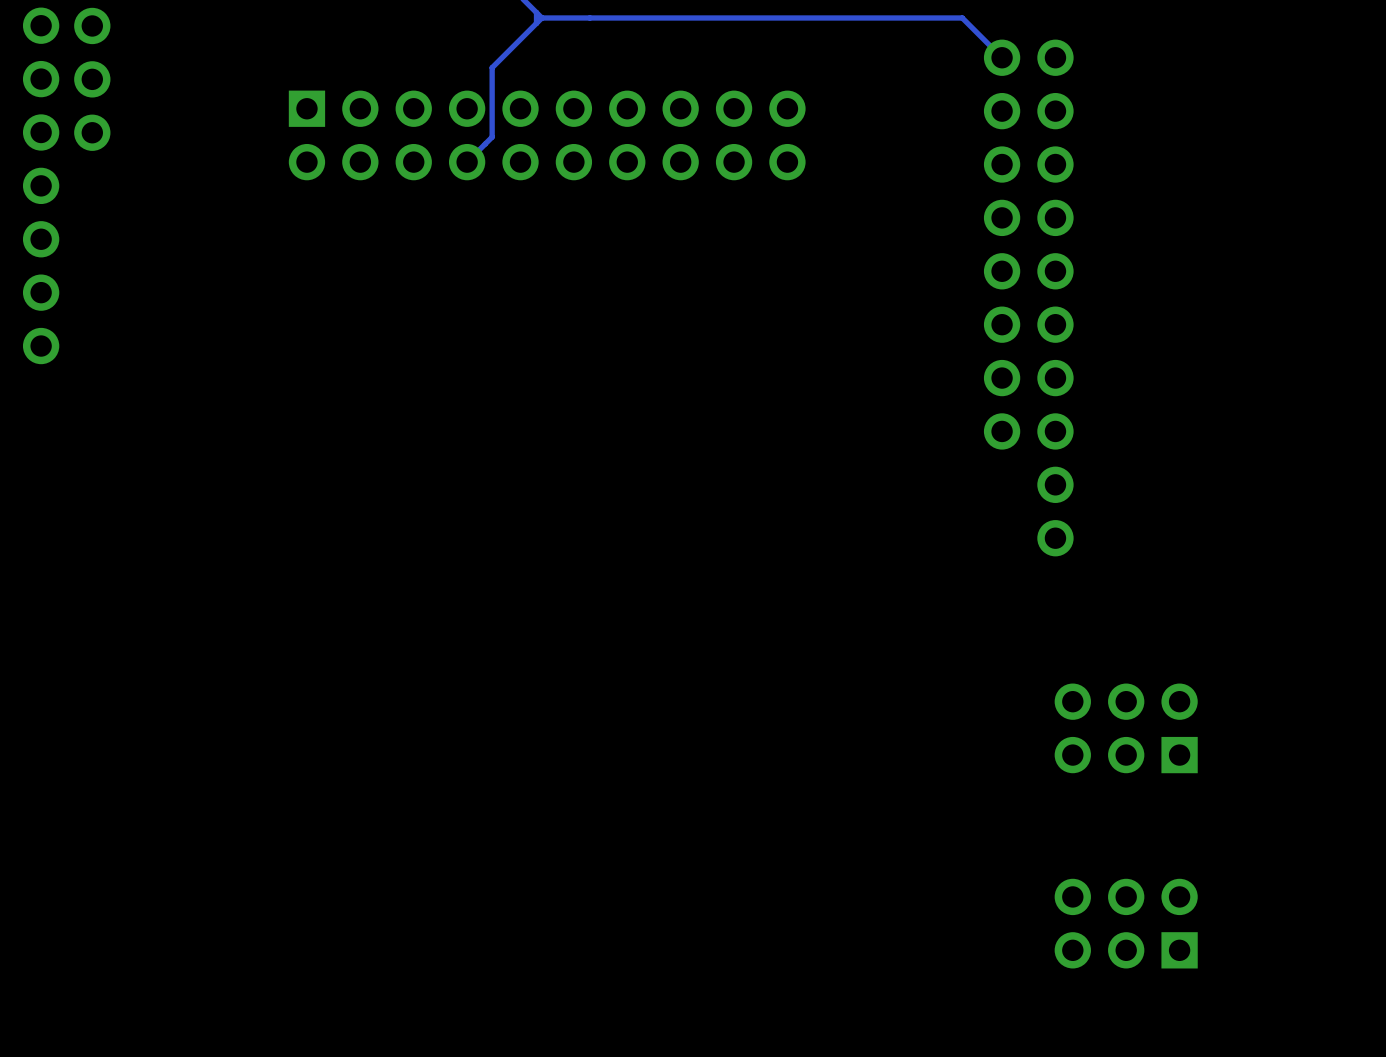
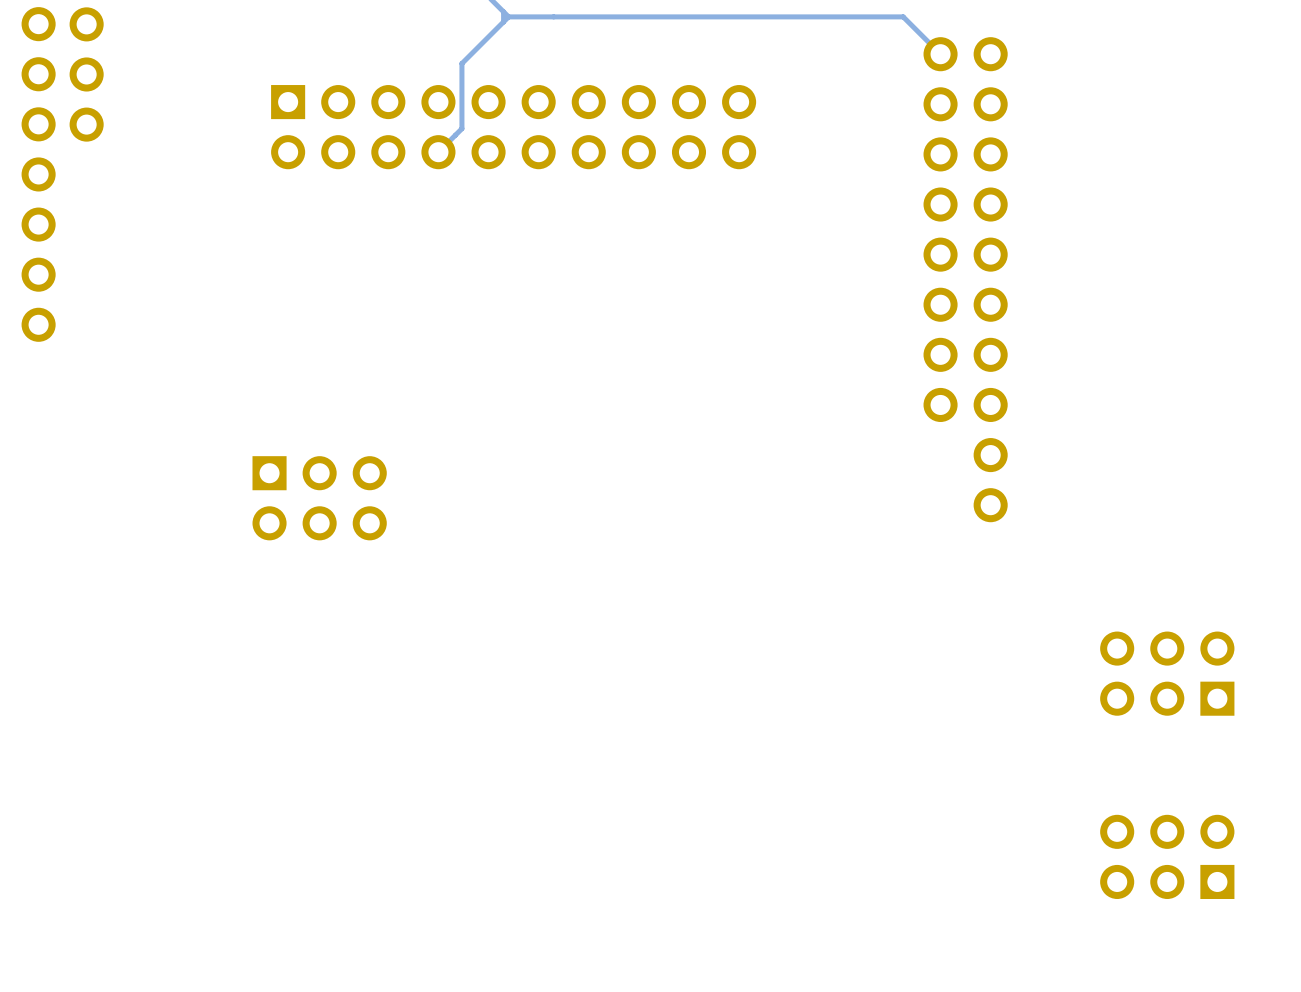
part: none -> (319, 498)
part: none -> (1167, 673)
part: (1126, 728) -> none
part: none -> (1167, 856)
part: (1126, 923) -> none

